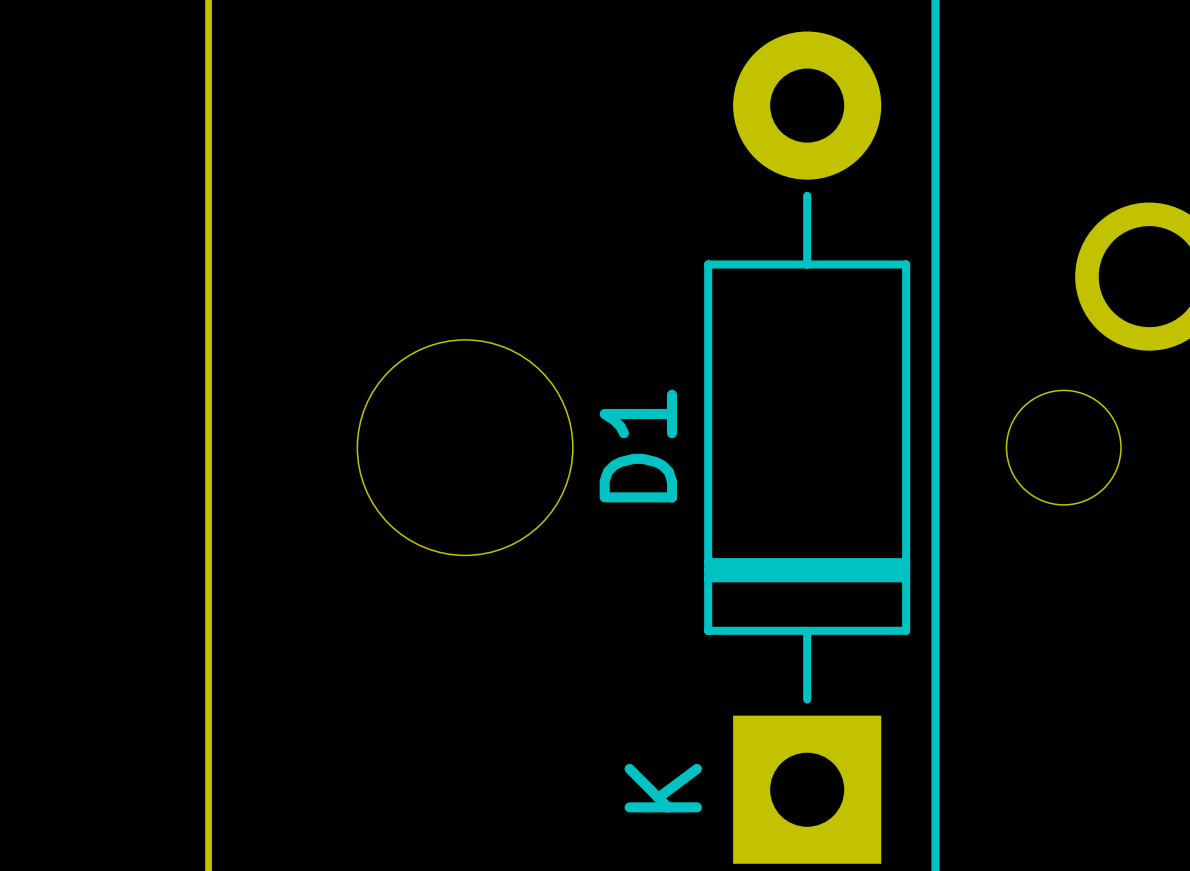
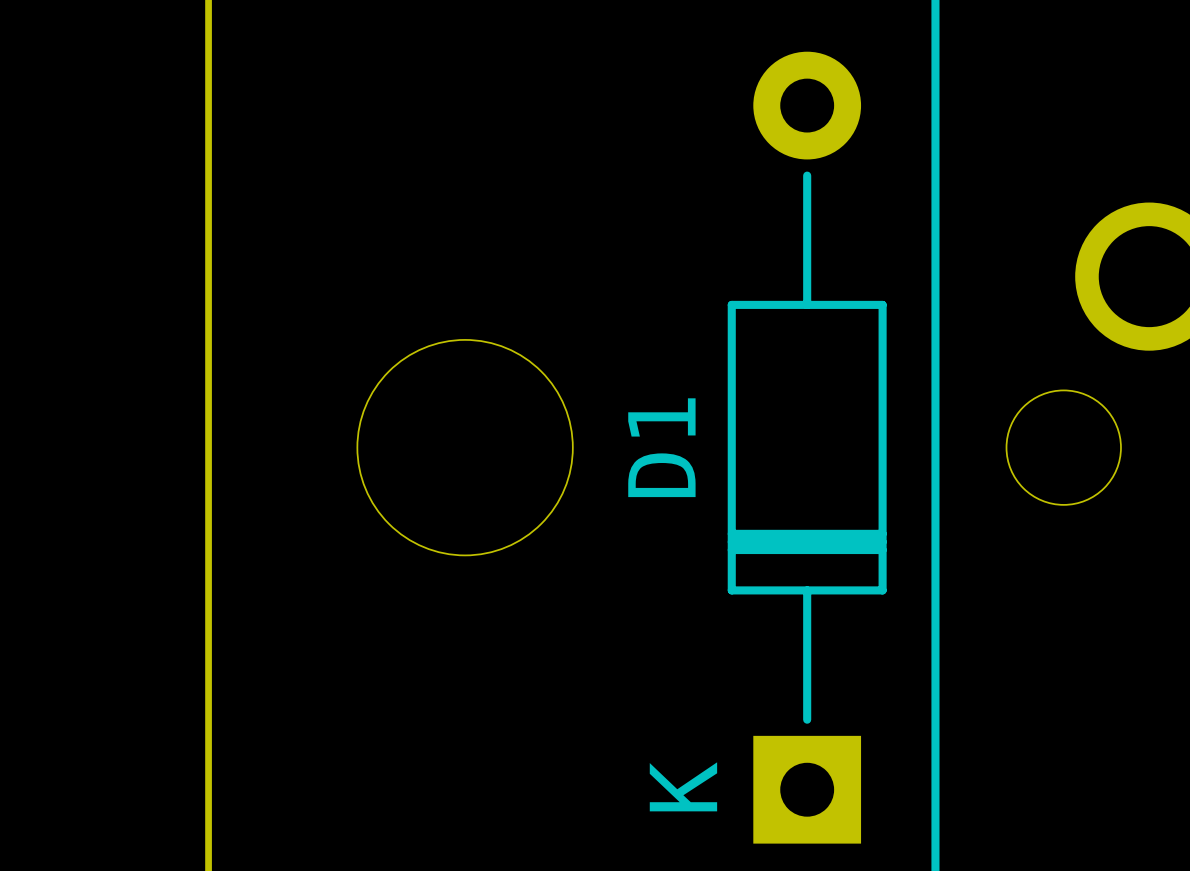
D1 footprint: [704, 31, 911, 864] -> [727, 51, 887, 844]

